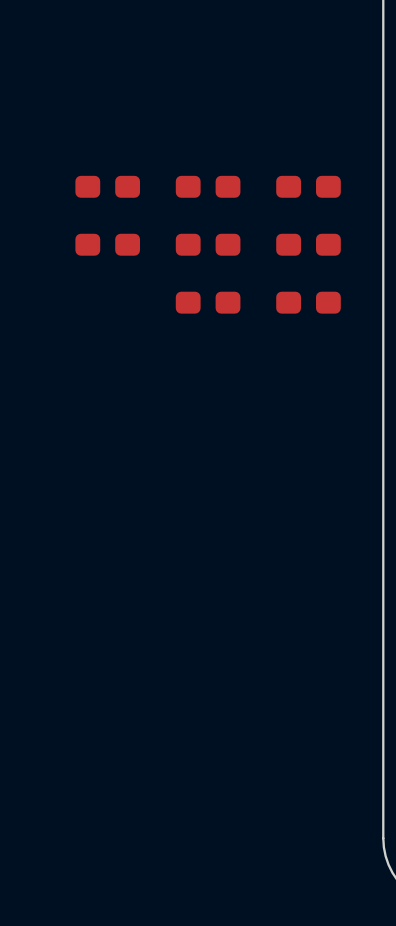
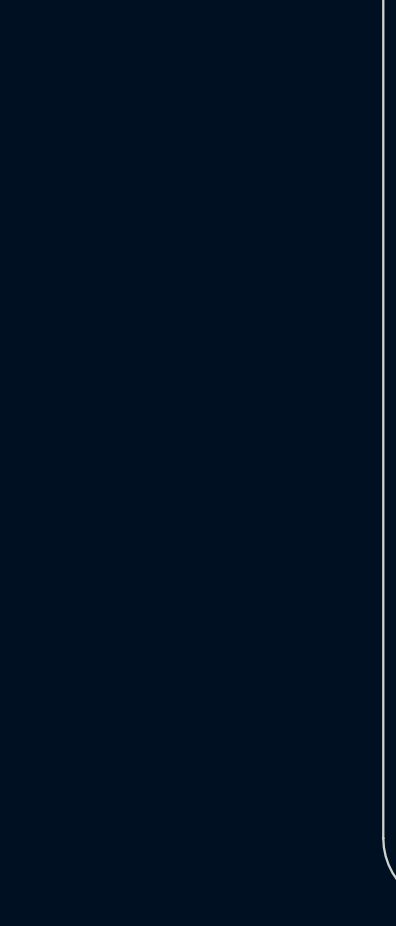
part: (107, 186) -> none
part: (208, 186) -> none
part: (308, 186) -> none
part: (107, 244) -> none
part: (208, 244) -> none
part: (308, 244) -> none
part: (208, 302) -> none
part: (308, 302) -> none

